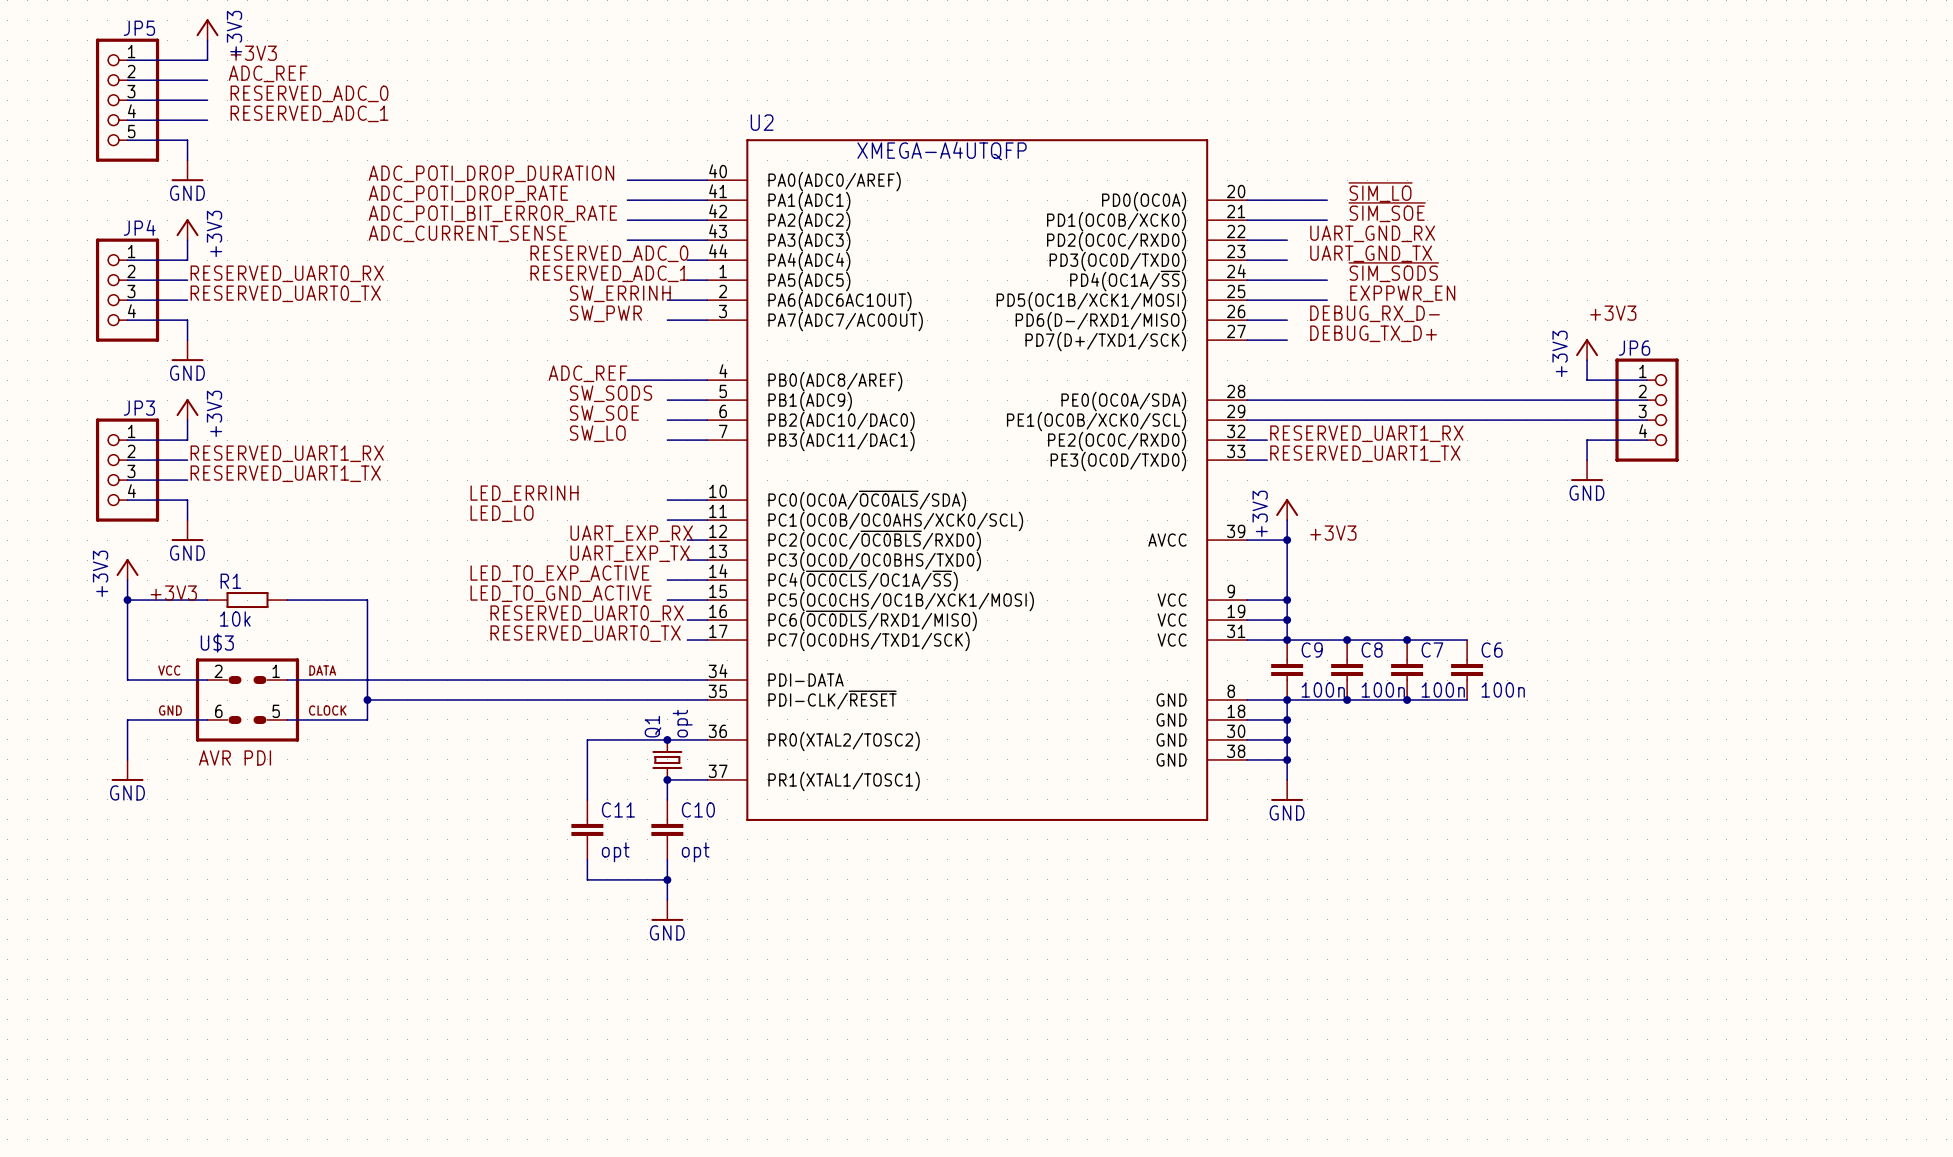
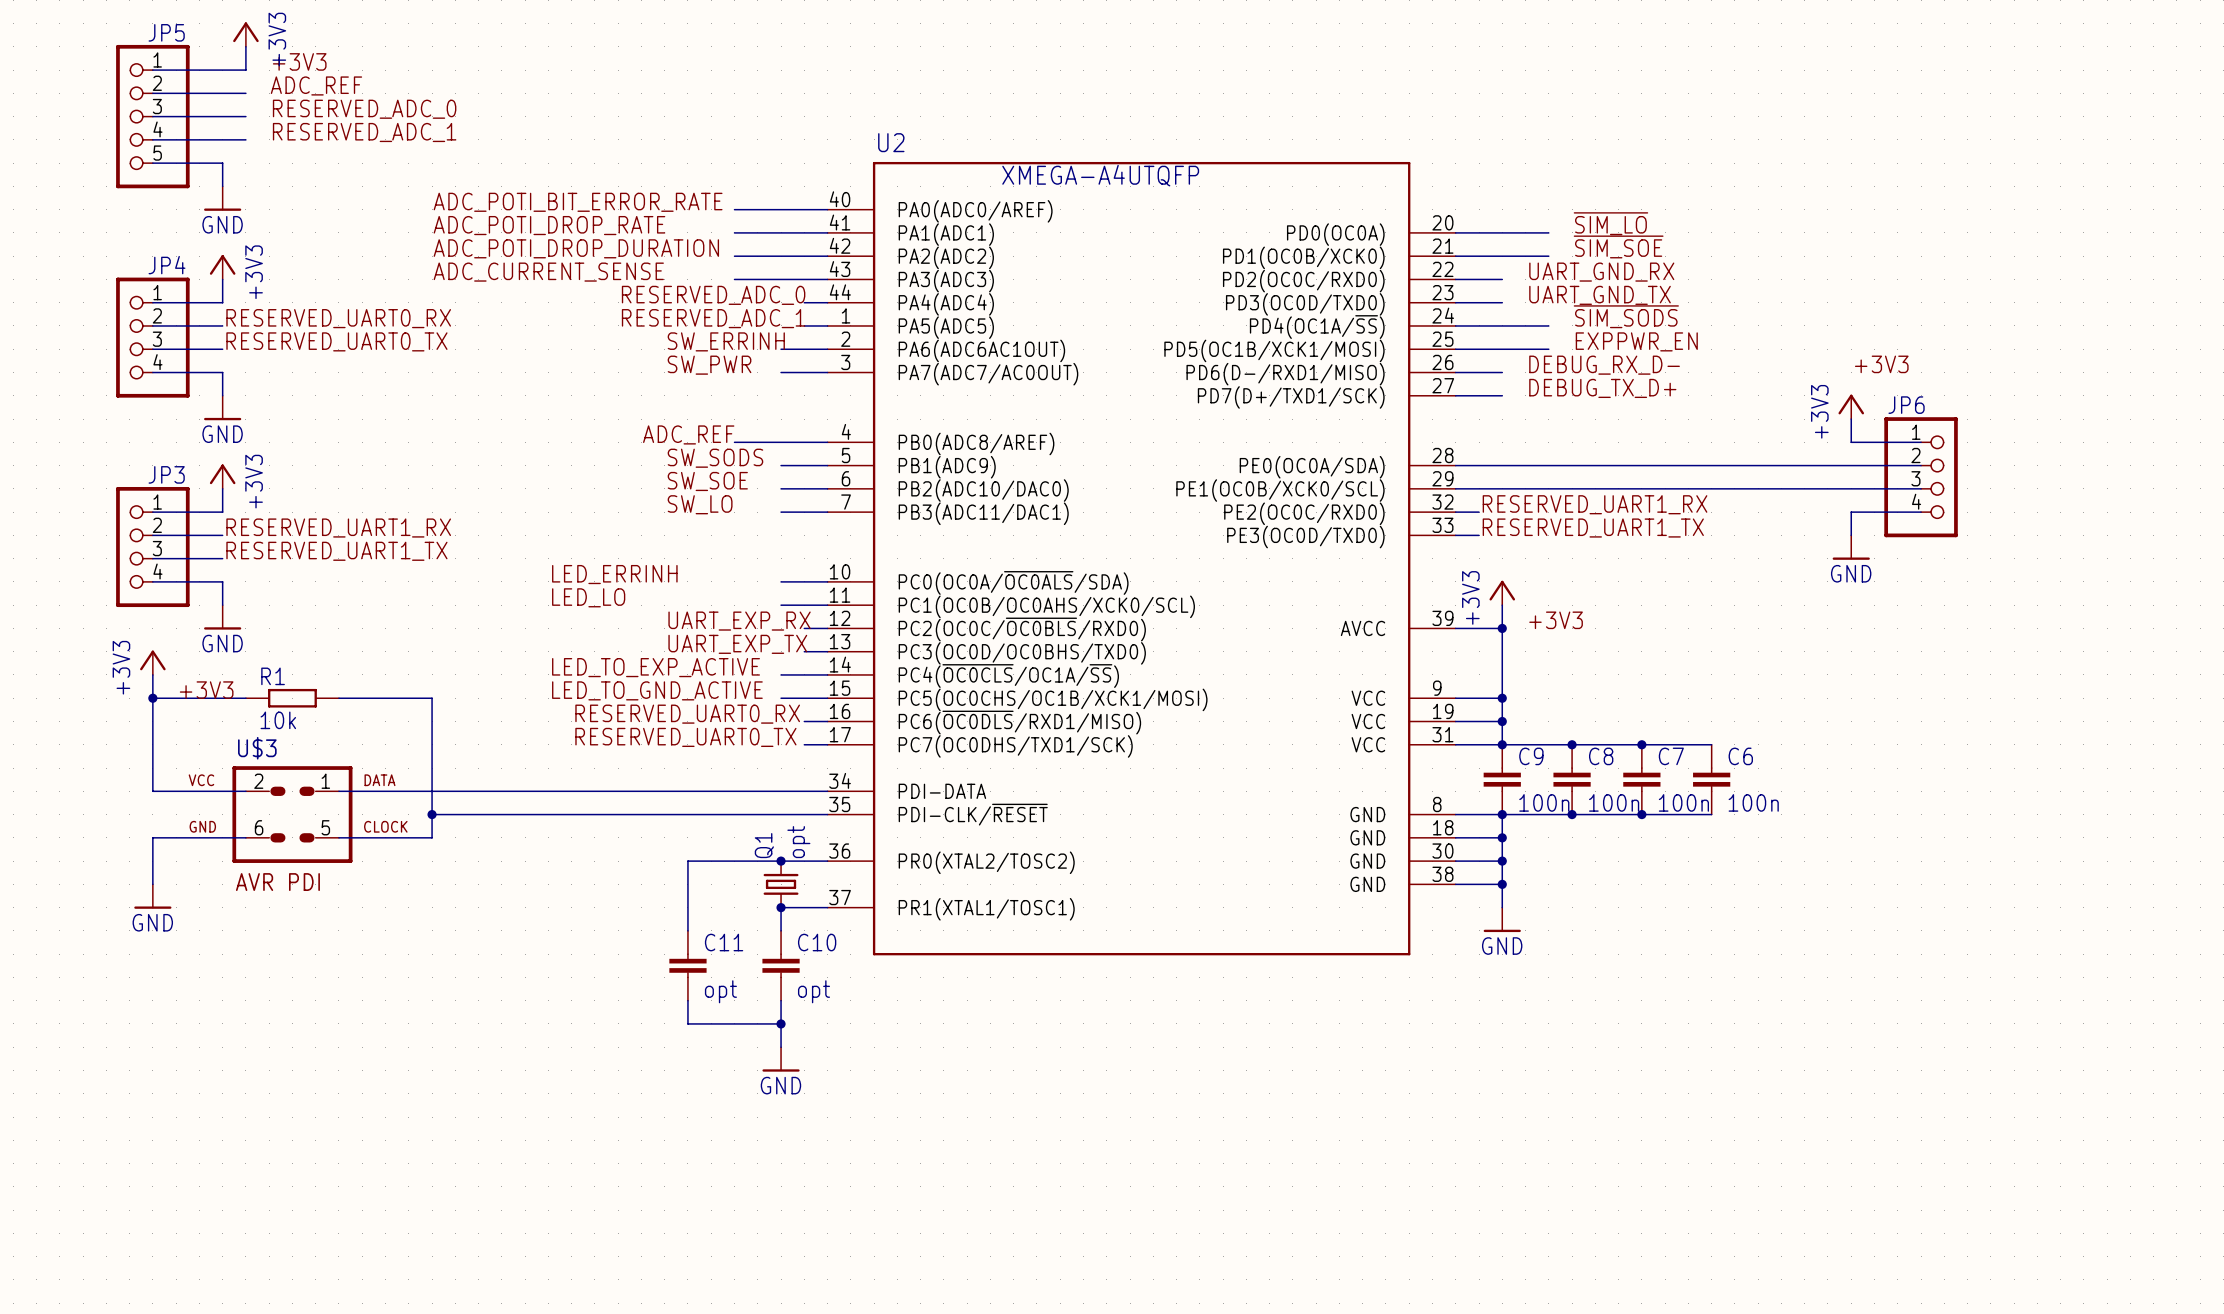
label: ADC_POTI_DROP_DURATION (491, 173) -> ADC_POTI_BIT_ERROR_RATE (578, 202)
label: ADC_POTI_BIT_ERROR_RATE (492, 213) -> ADC_POTI_DROP_DURATION (576, 248)

